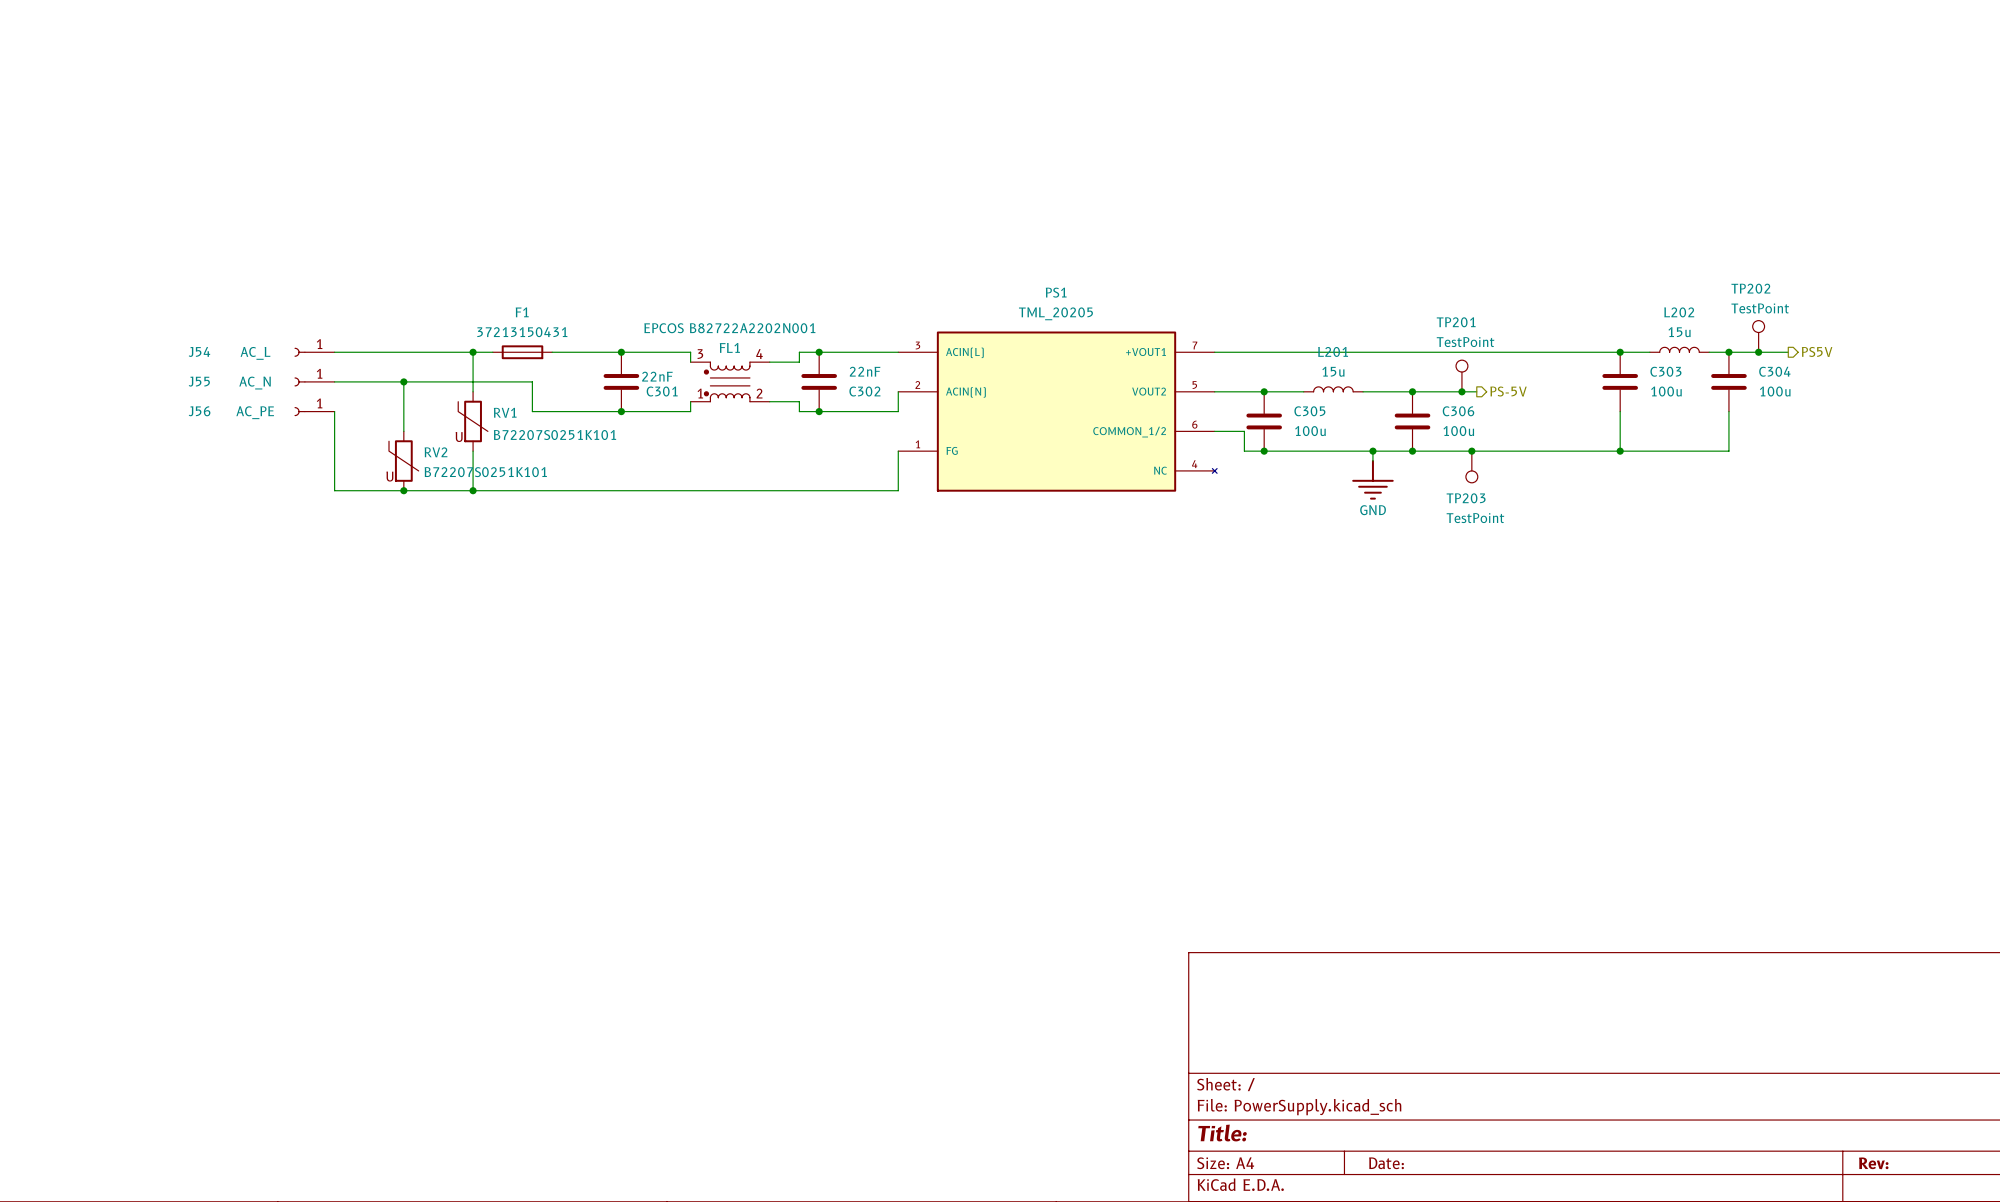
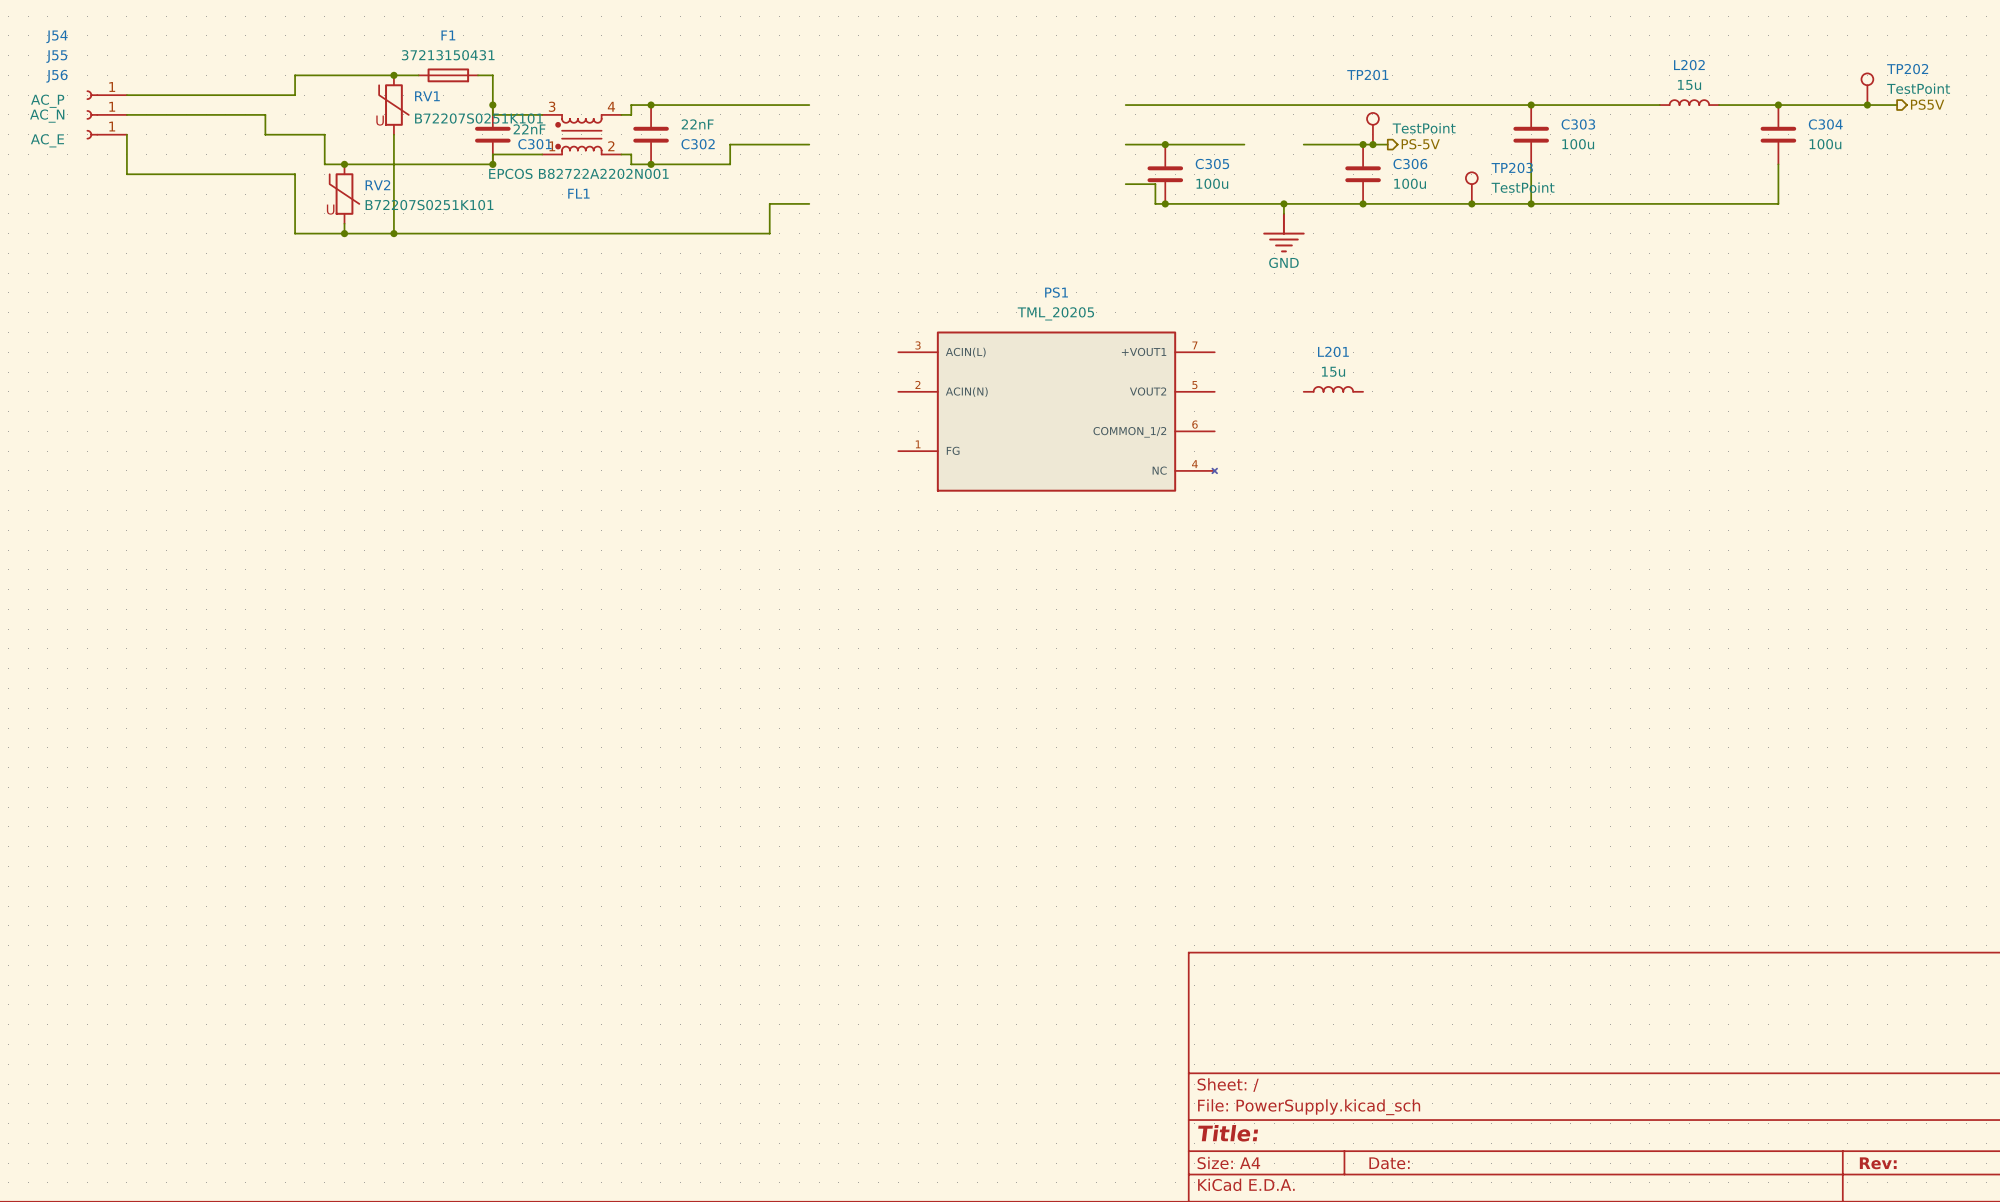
junction: none -> (393, 75)
wire: none -> (418, 75) (295, 75) (295, 95) (126, 95)
wire: none -> (478, 75) (492, 75) (492, 114) (542, 114)
hierarchical label: none -> PS5V (1927, 104)
junction: none -> (492, 105)
junction: none -> (651, 105)
wire: none -> (809, 105) (631, 105) (631, 114) (621, 114)
wire: none -> (1125, 105) (1659, 105)
junction: none -> (1531, 105)
wire: none -> (1719, 105) (1897, 105)
junction: none -> (1778, 105)
junction: none -> (1867, 105)
wire: none -> (126, 114) (265, 114) (265, 134) (324, 134) (324, 164) (492, 164) (492, 154) (542, 154)
wire: none -> (126, 134) (126, 174) (295, 174) (295, 233) (769, 233) (769, 203) (809, 203)
wire: none -> (393, 134) (393, 233)
wire: none -> (809, 144) (730, 144) (730, 164) (631, 164) (631, 154) (621, 154)
wire: none -> (1125, 144) (1244, 144)
junction: none -> (1165, 144)
wire: none -> (1303, 144) (1387, 144)
junction: none -> (1363, 144)
junction: none -> (1372, 144)
hierarchical label: none -> PS-5V (1420, 144)
junction: none -> (344, 164)
junction: none -> (492, 164)
junction: none -> (651, 164)
wire: none -> (1531, 164) (1531, 203)
wire: none -> (1778, 164) (1778, 203) (1155, 203) (1155, 184) (1125, 184)
junction: none -> (1165, 203)
wire: none -> (1283, 203) (1283, 213)
junction: none -> (1283, 203)
junction: none -> (1363, 203)
junction: none -> (1471, 203)
junction: none -> (1531, 203)
wire: none -> (344, 223) (344, 233)
power symbol: none -> GND (1283, 232)
junction: none -> (344, 233)
junction: none -> (393, 233)
TP202 name position: TP202 (1750, 288) -> TP202 (1907, 69)
TP202 value position: TestPoint (1760, 308) -> TestPoint (1918, 88)
FL1 value position: EPCOS B82722A2202N001 (729, 328) -> EPCOS B82722A2202N001 (578, 173)
TP202 position: (1758, 336) -> (1867, 89)
TP201 value position: TestPoint (1465, 342) -> TestPoint (1424, 128)
FL1 name position: FL1 (729, 347) -> FL1 (578, 193)
L202 position: (1679, 349) -> (1689, 102)
J54 name position: J54 (199, 351) -> J54 (56, 36)
hierarchical label: PS5V (1817, 351) -> none
J54 position: (314, 352) -> (106, 95)
wire: (334, 352) (492, 352) -> none
wire: (473, 352) (473, 391) -> none
junction: (473, 352) -> none
F1 position: (522, 352) -> (448, 75)
wire: (552, 352) (690, 352) (690, 362) -> none
junction: (621, 352) -> none
junction: (819, 352) -> none
wire: (898, 352) (799, 352) (799, 362) (769, 362) -> none
wire: (1214, 352) (1649, 352) -> none
junction: (1620, 352) -> none
wire: (1709, 352) (1788, 352) -> none
junction: (1728, 352) -> none
junction: (1758, 352) -> none
J54 value: AC_L (255, 353) -> AC_P (47, 101)
TP201 position: (1461, 375) -> (1372, 128)
J55 name position: J55 (199, 381) -> J55 (56, 56)
J55 position: (314, 381) -> (106, 114)
wire: (334, 381) (532, 381) (532, 411) (690, 411) (690, 401) -> none
wire: (403, 381) (403, 431) -> none
junction: (403, 381) -> none
C301 position: (621, 381) -> (492, 134)
FL1 position: (730, 381) -> (581, 134)
C302 position: (819, 381) -> (651, 134)
C303 position: (1620, 381) -> (1531, 134)
C304 position: (1728, 381) -> (1778, 134)
wire: (898, 391) (898, 411) (799, 411) (799, 401) (769, 401) -> none
wire: (1214, 391) (1303, 391) -> none
junction: (1264, 391) -> none
wire: (1363, 391) (1476, 391) -> none
junction: (1412, 391) -> none
junction: (1461, 391) -> none
hierarchical label: PS-5V (1508, 391) -> none
J56 name position: J56 (199, 411) -> J56 (56, 76)
J56 position: (314, 411) -> (106, 134)
wire: (334, 411) (334, 490) (898, 490) (898, 451) -> none
junction: (621, 411) -> none
junction: (819, 411) -> none
wire: (1620, 411) (1620, 451) -> none
wire: (1728, 411) (1728, 451) (1244, 451) (1244, 431) (1214, 431) -> none
J56 value: AC_PE (255, 412) -> AC_E (47, 140)
RV1 position: (473, 421) -> (393, 105)
C305 position: (1264, 421) -> (1165, 174)
C306 position: (1412, 421) -> (1363, 174)
wire: (473, 451) (473, 490) -> none
junction: (1264, 451) -> none
wire: (1372, 451) (1372, 461) -> none
junction: (1372, 451) -> none
junction: (1412, 451) -> none
junction: (1471, 451) -> none
junction: (1620, 451) -> none
RV2 position: (403, 461) -> (344, 194)
TP203 position: (1471, 466) -> (1471, 188)
TP203 rotation: 0° (1471, 476) -> 180° (1471, 178)
power symbol: GND (1372, 479) -> none
junction: (403, 490) -> none
junction: (473, 490) -> none
TP203 name position: TP203 (1466, 498) -> TP203 (1512, 167)
TP203 value position: TestPoint (1475, 518) -> TestPoint (1523, 187)

